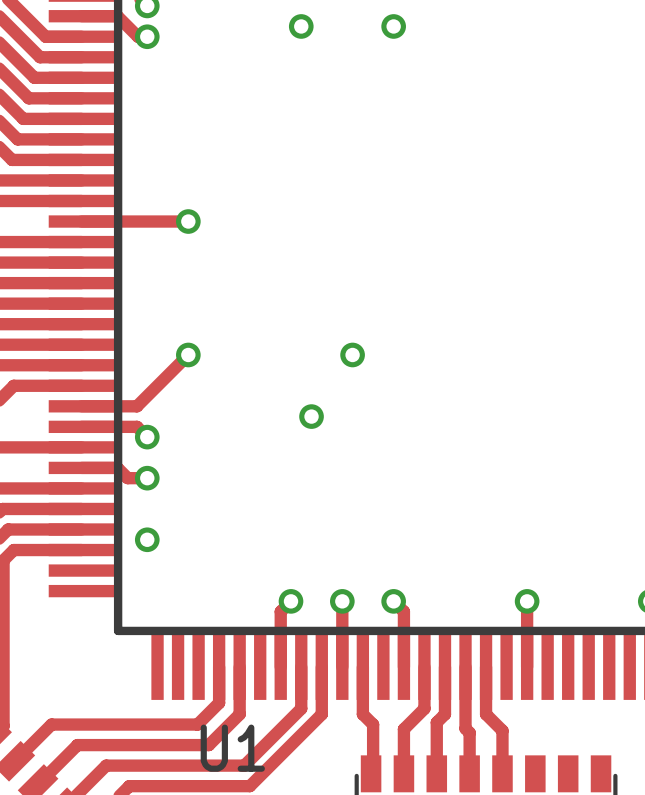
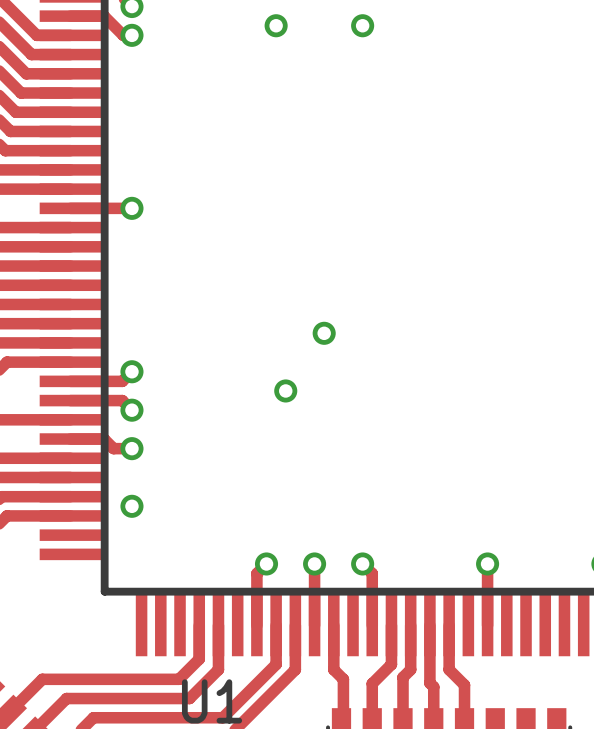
track: (147, 221) (188, 221) -> none
via position: (188, 221) -> (131, 208)
track: (188, 354) (147, 396) -> none
via position: (188, 354) -> (131, 371)

